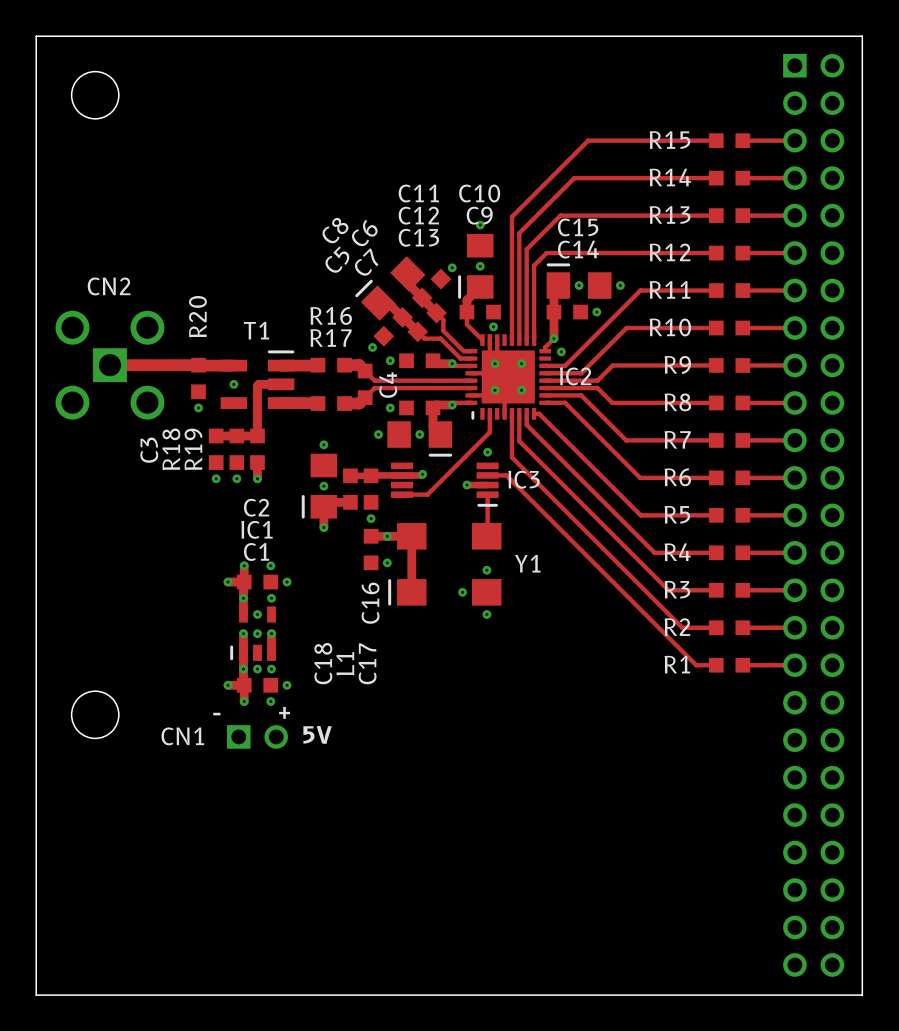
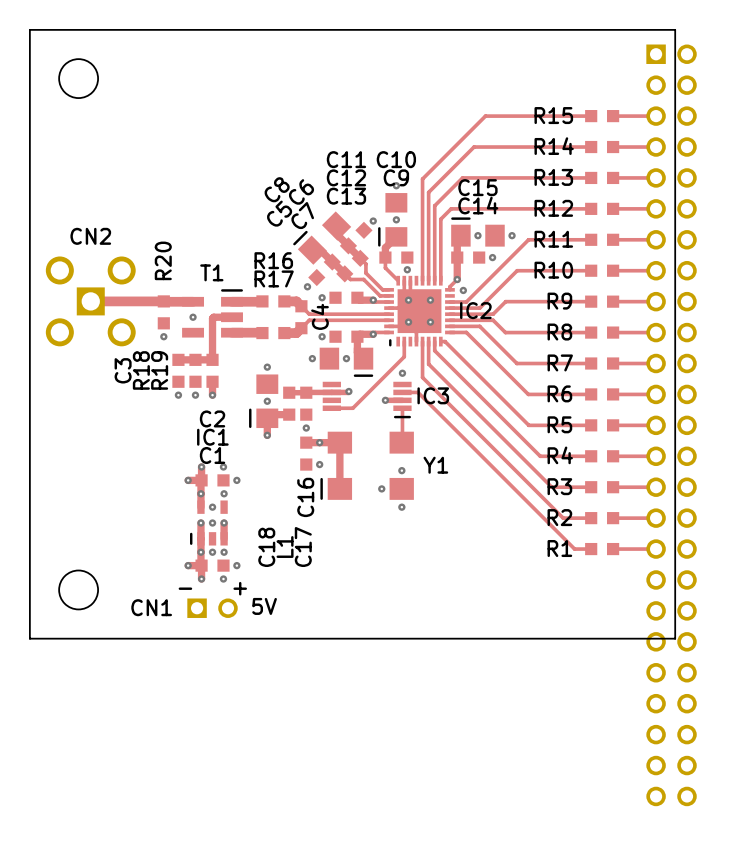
board edge: (818, 36) (862, 36) (862, 995) (36, 995) (36, 773) -> (675, 29) (675, 638) (29, 638)

